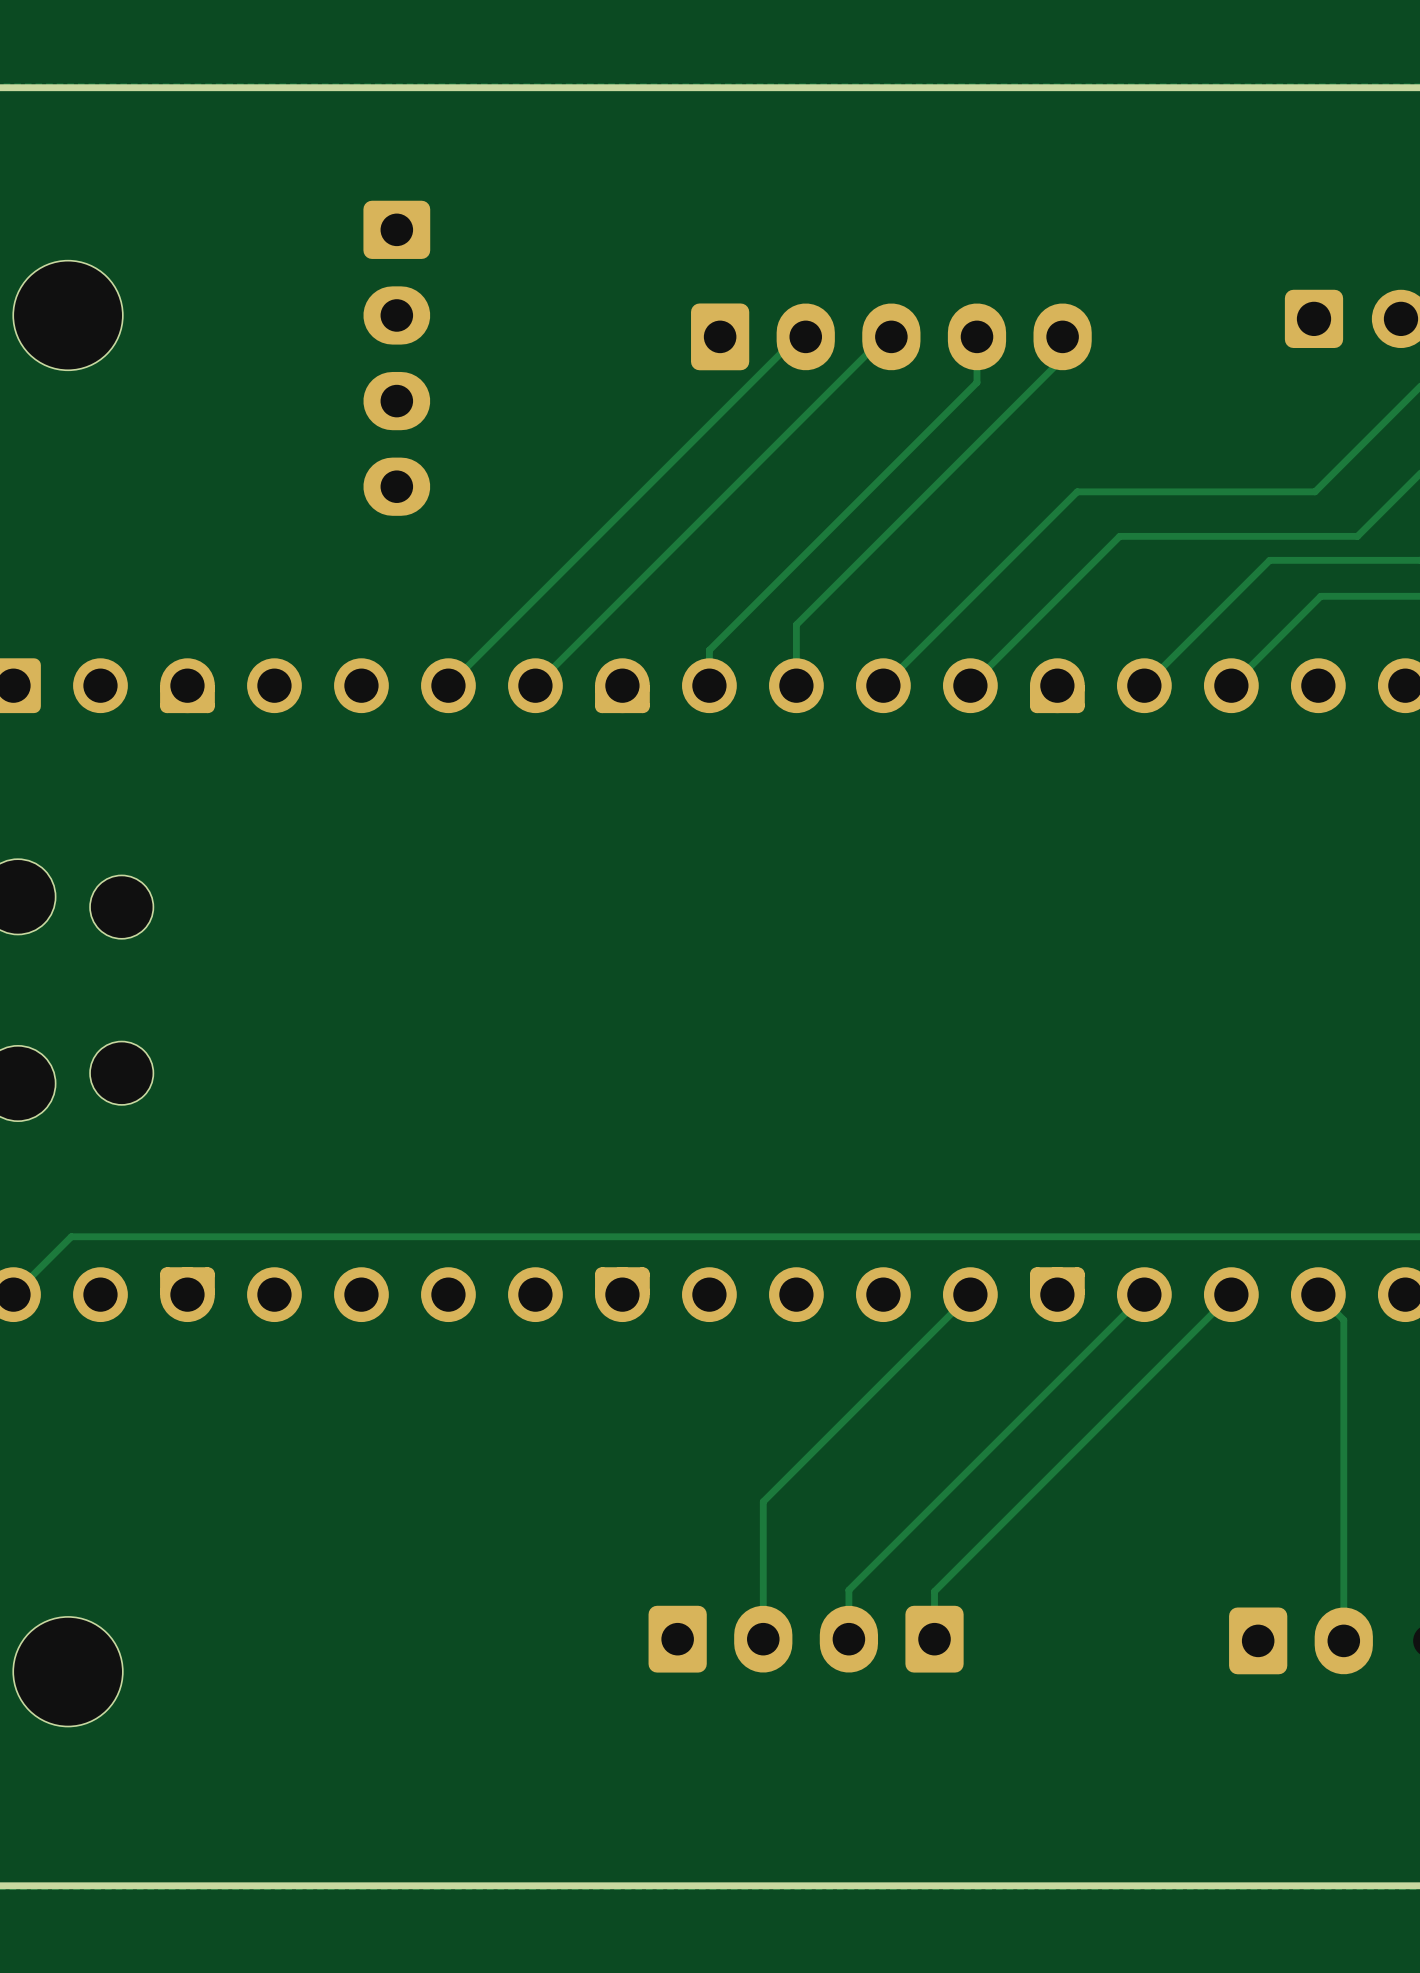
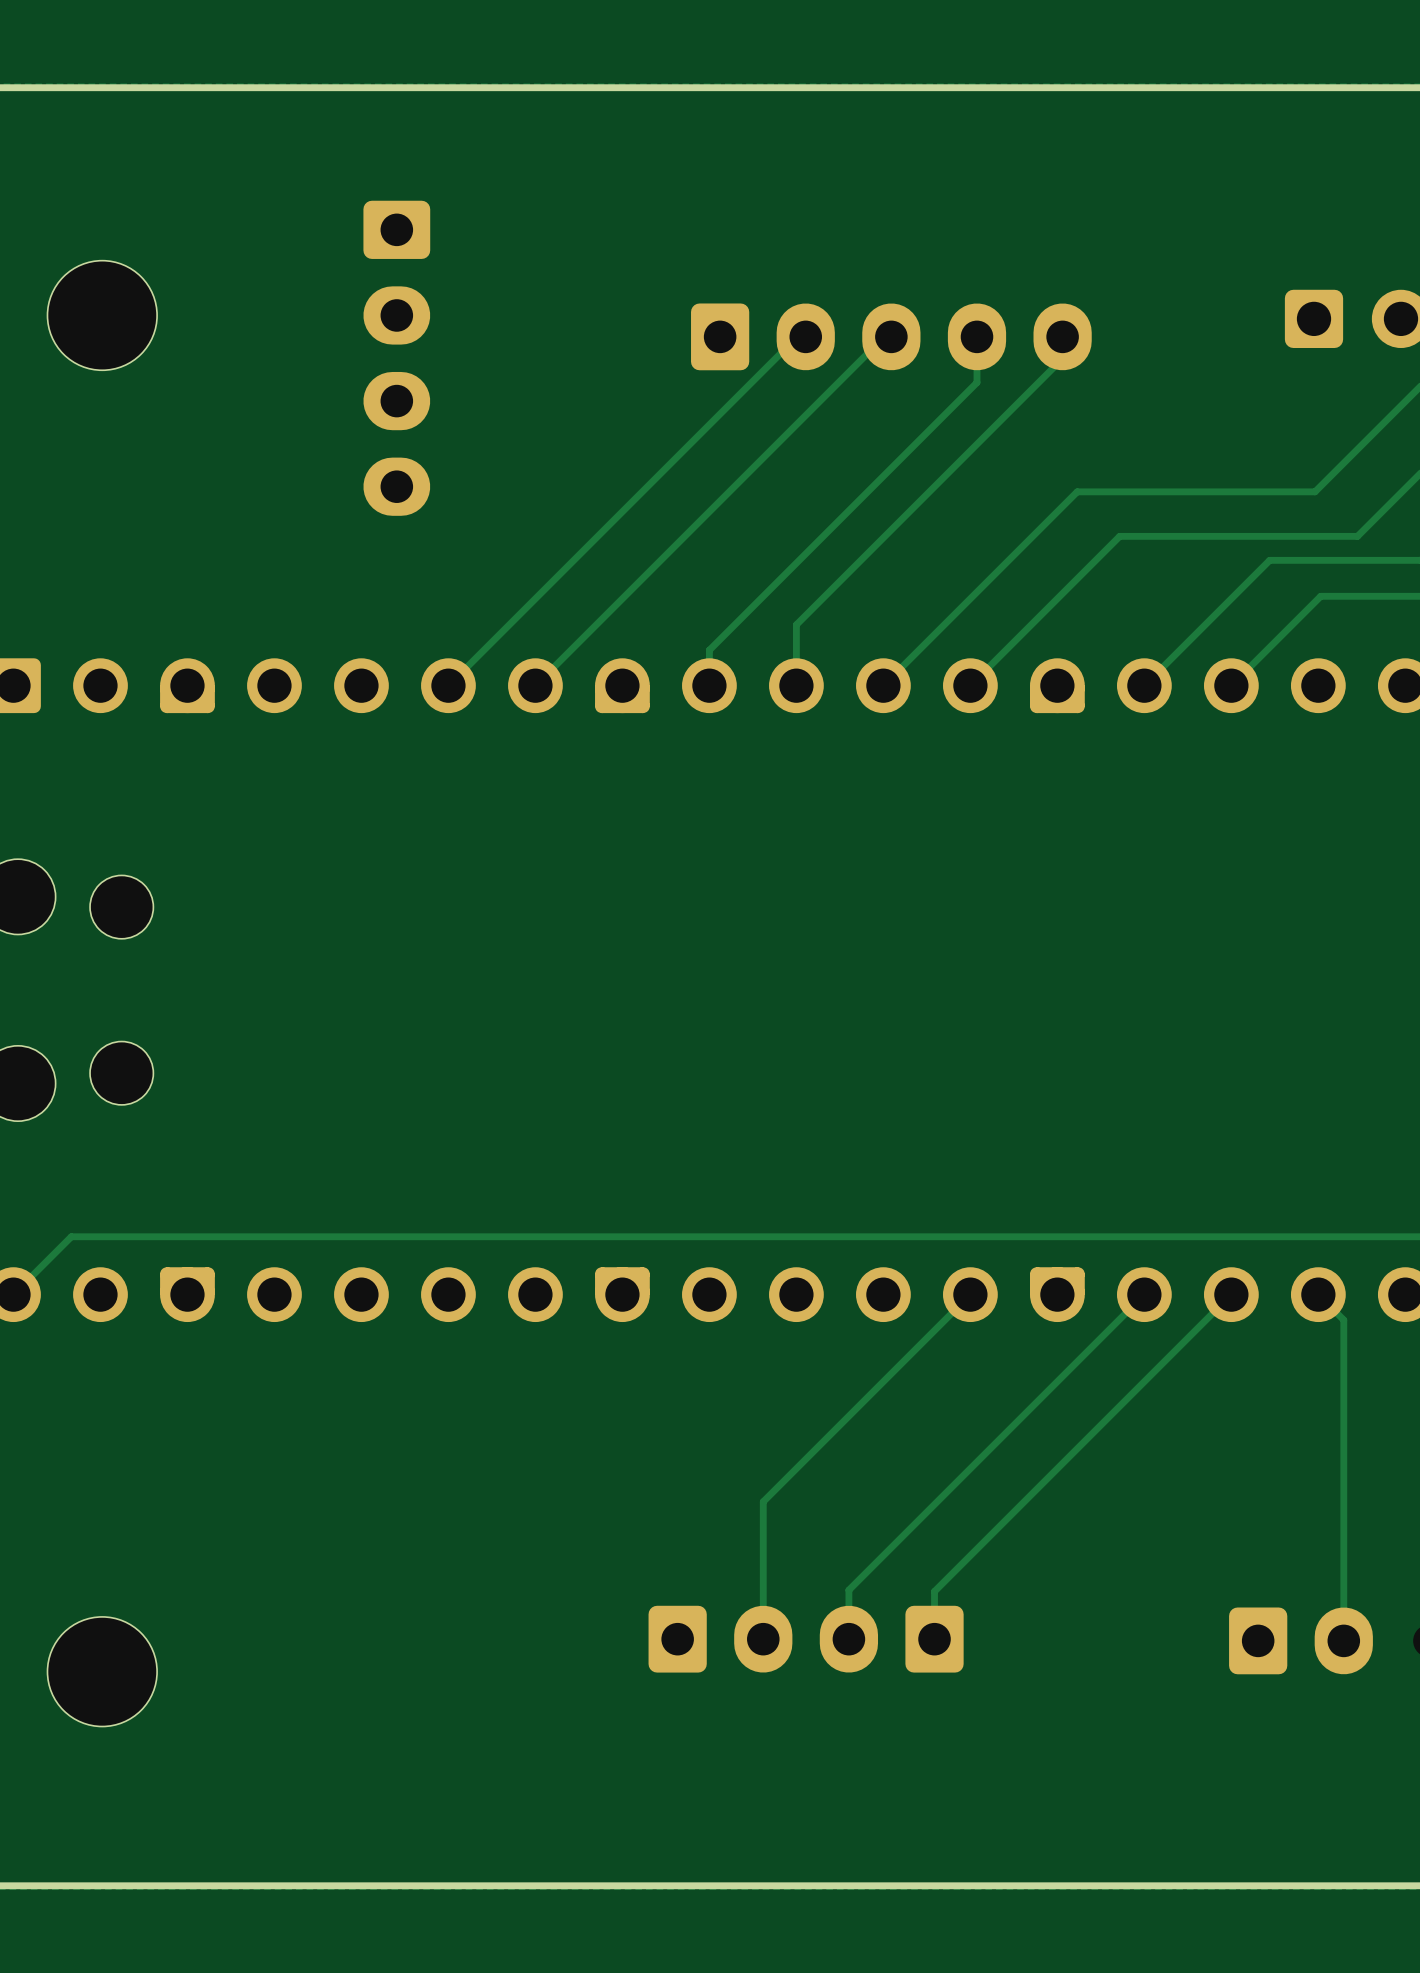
part position: (68, 315) -> (102, 315)
part position: (68, 1671) -> (102, 1671)

